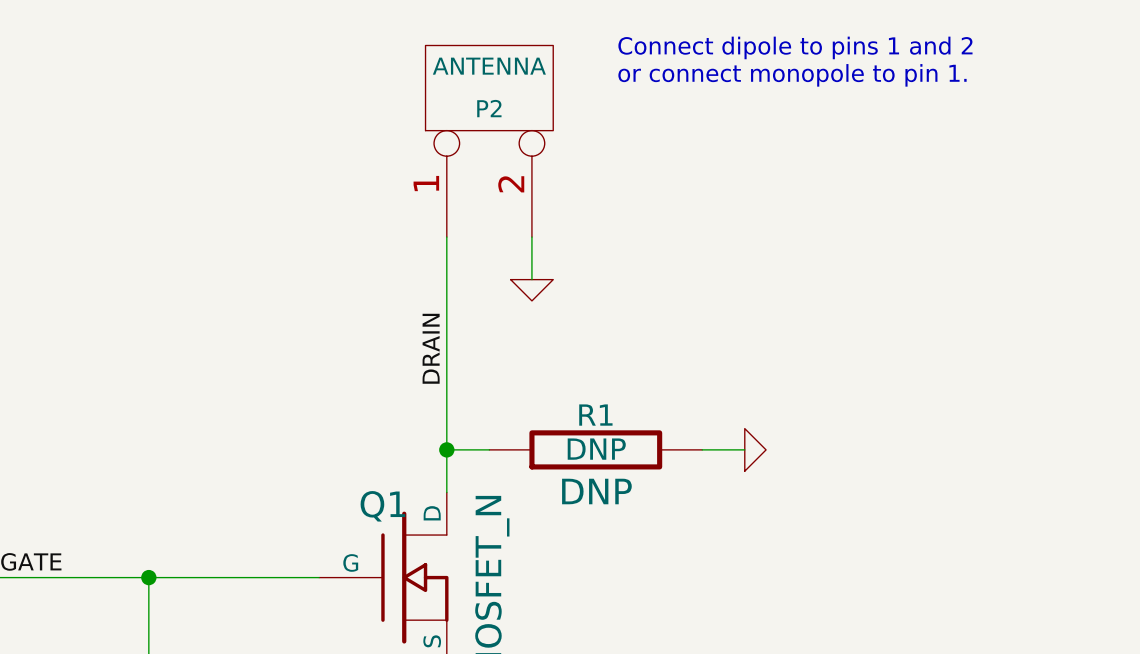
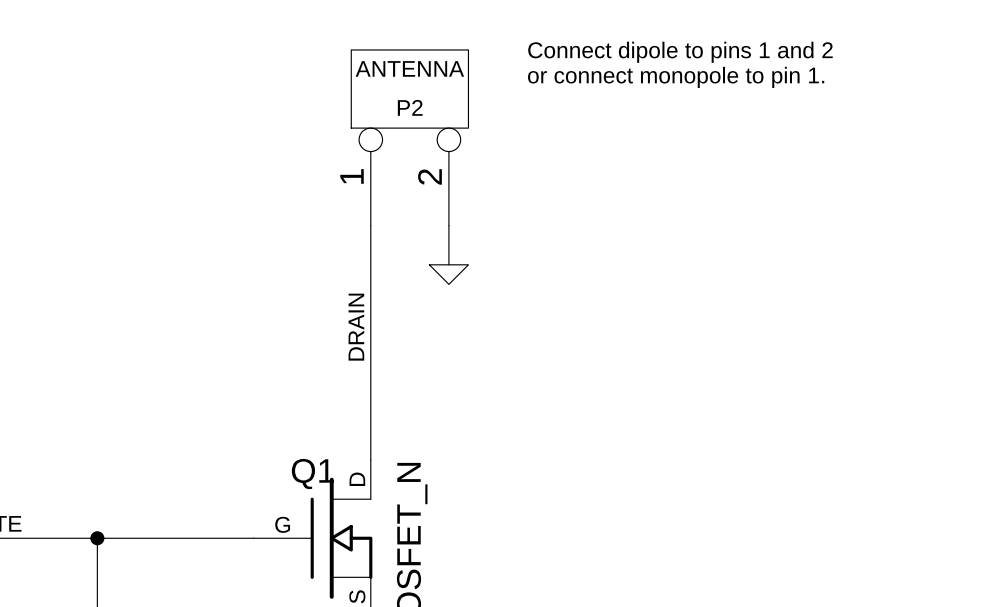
wire: (446, 449) (489, 449) -> none
junction: (446, 449) -> none
R1: DNP (595, 449) -> none
wire: (702, 449) (744, 449) -> none
power symbol: (755, 449) -> none

